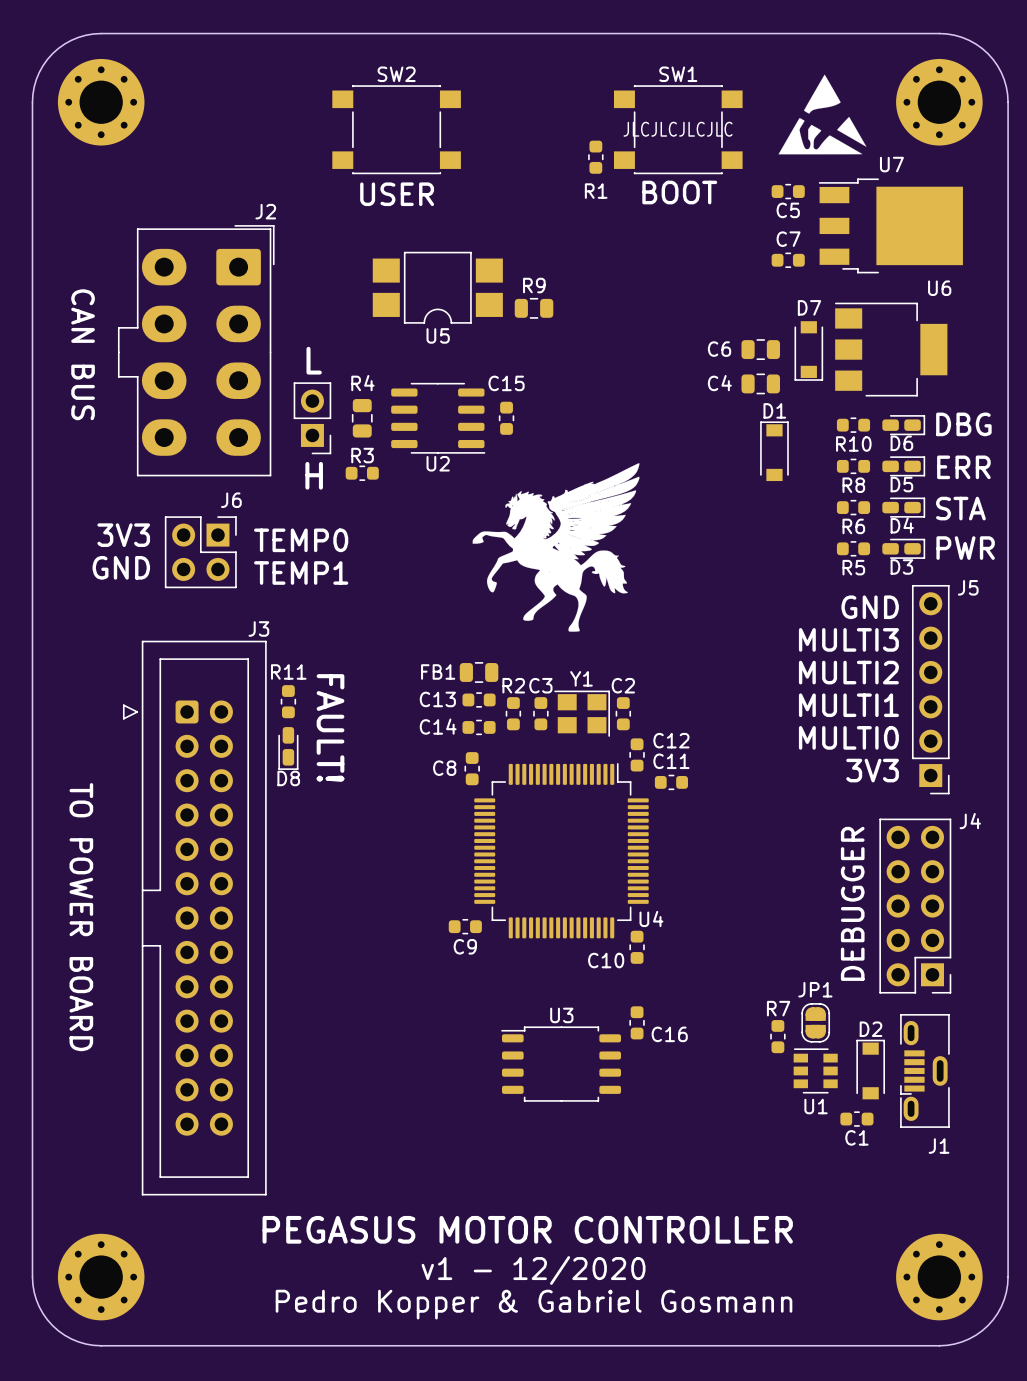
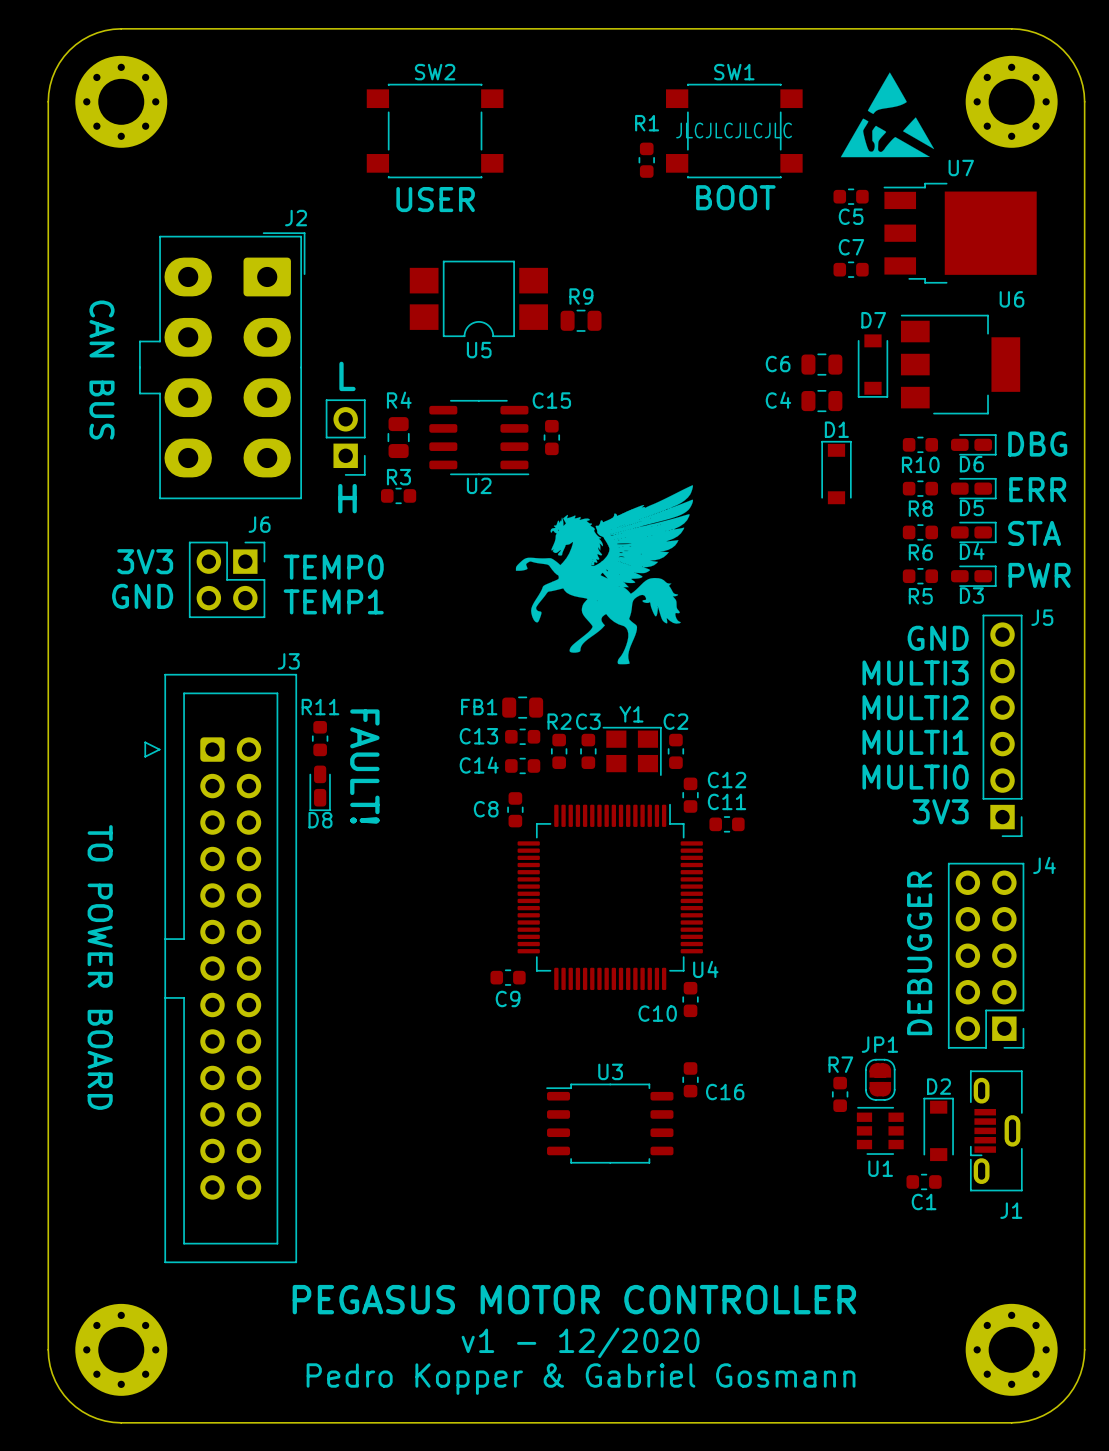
R1 name position: R1 (596, 191) -> R1 (647, 123)

